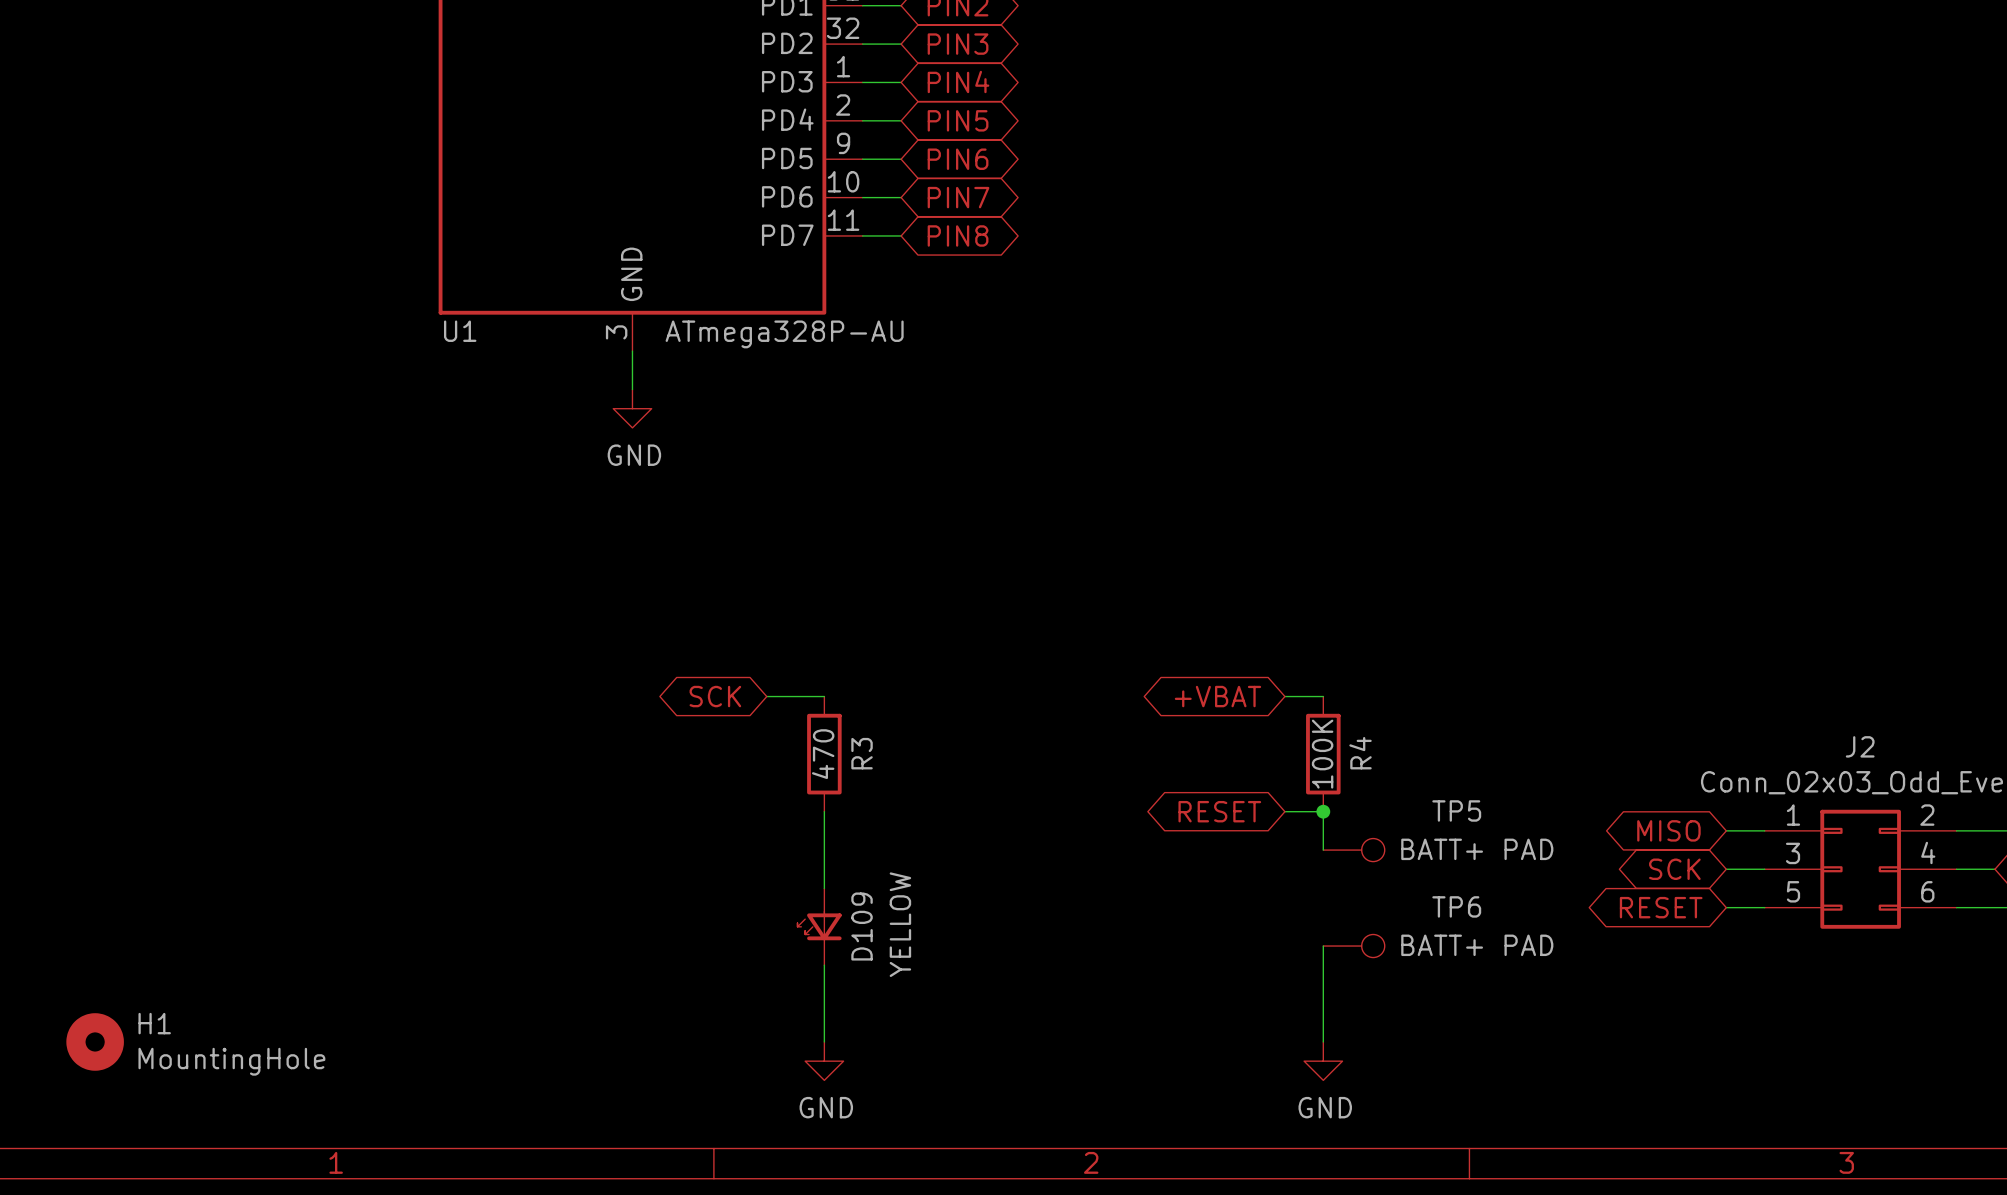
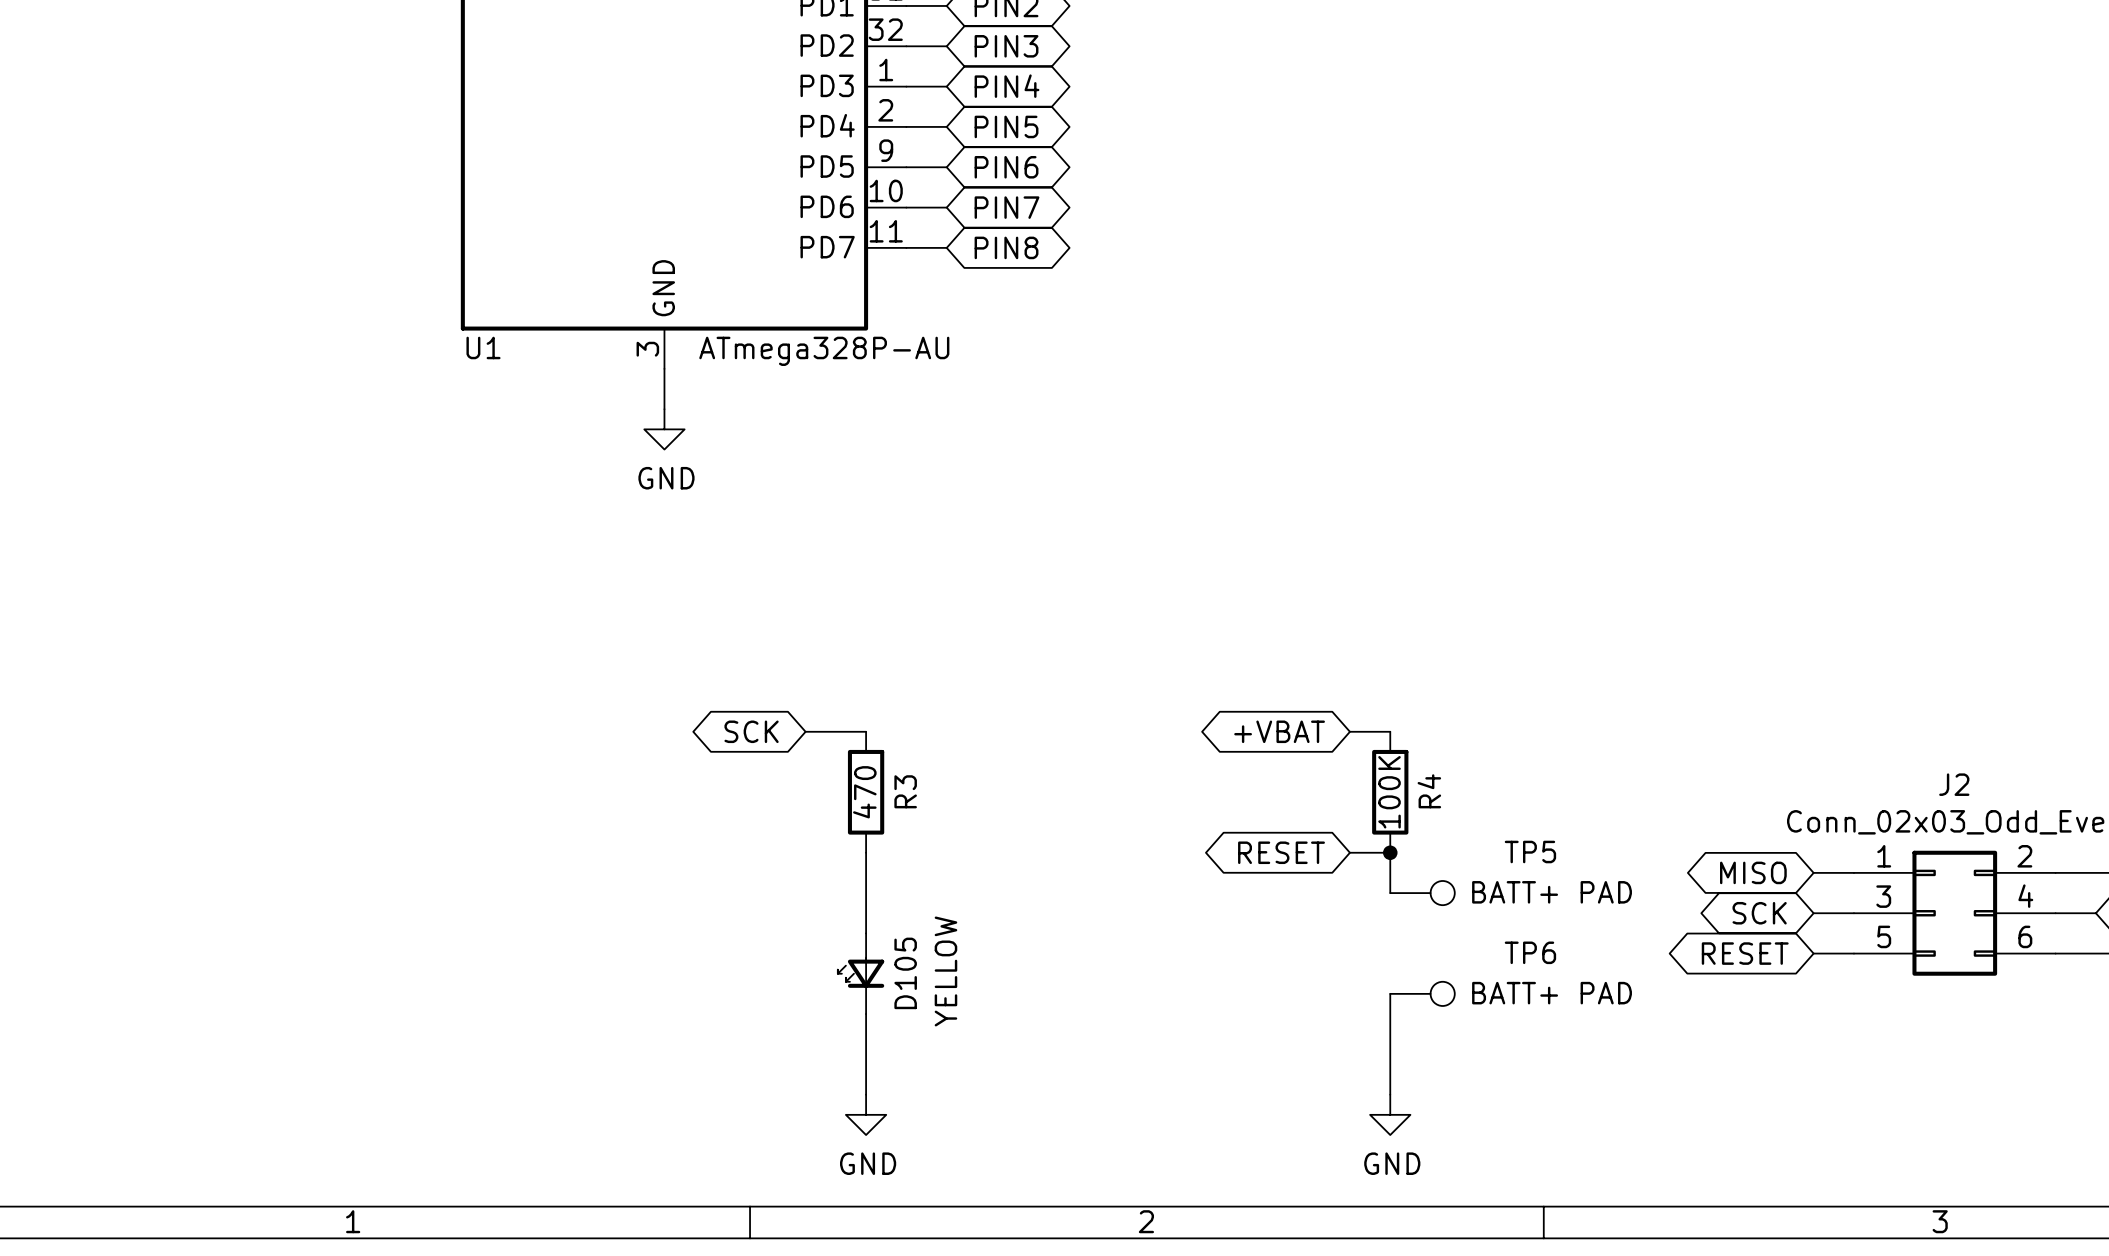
D109 name: D109 (862, 926) -> D105 (905, 973)
H1: MountingHole (95, 1041) -> none

